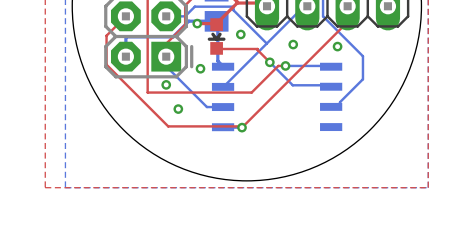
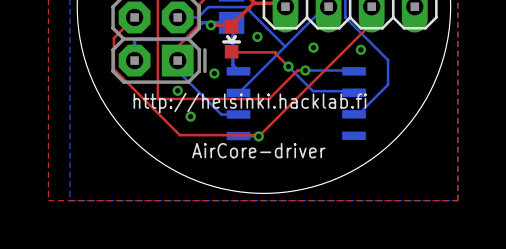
text: none -> http://helsinki.hacklab.fi (250, 103)
text: none -> AirCore-driver (258, 150)

